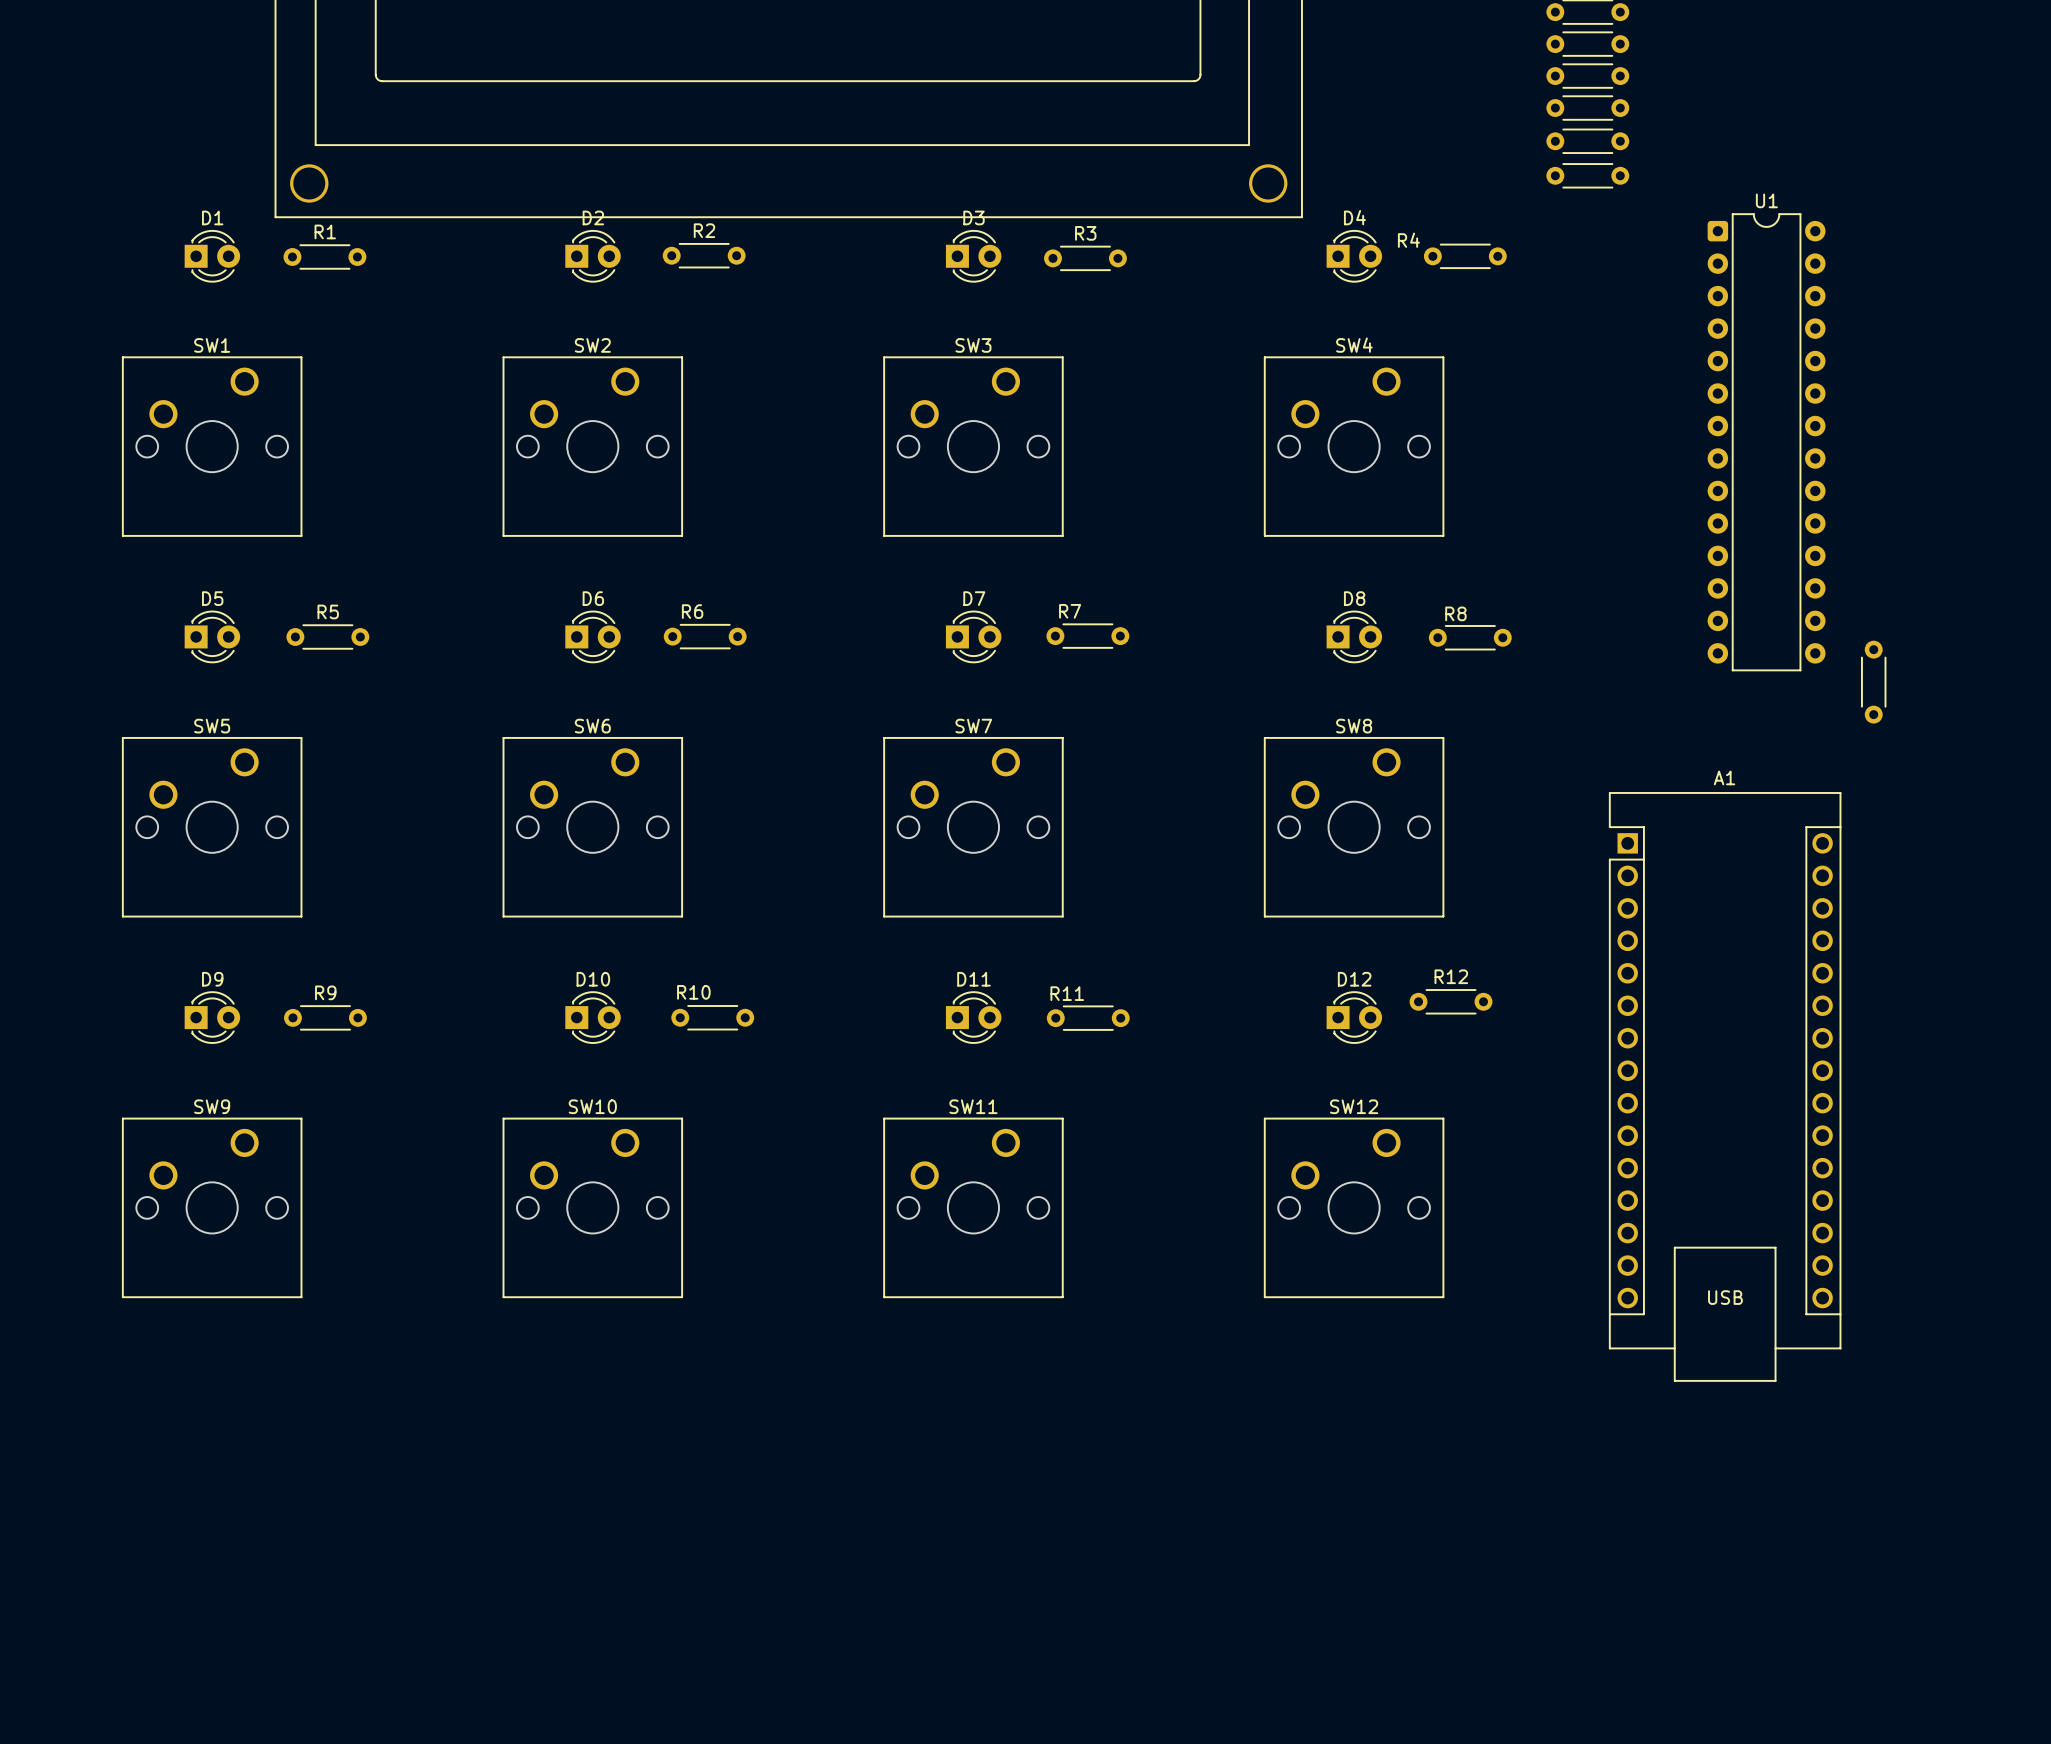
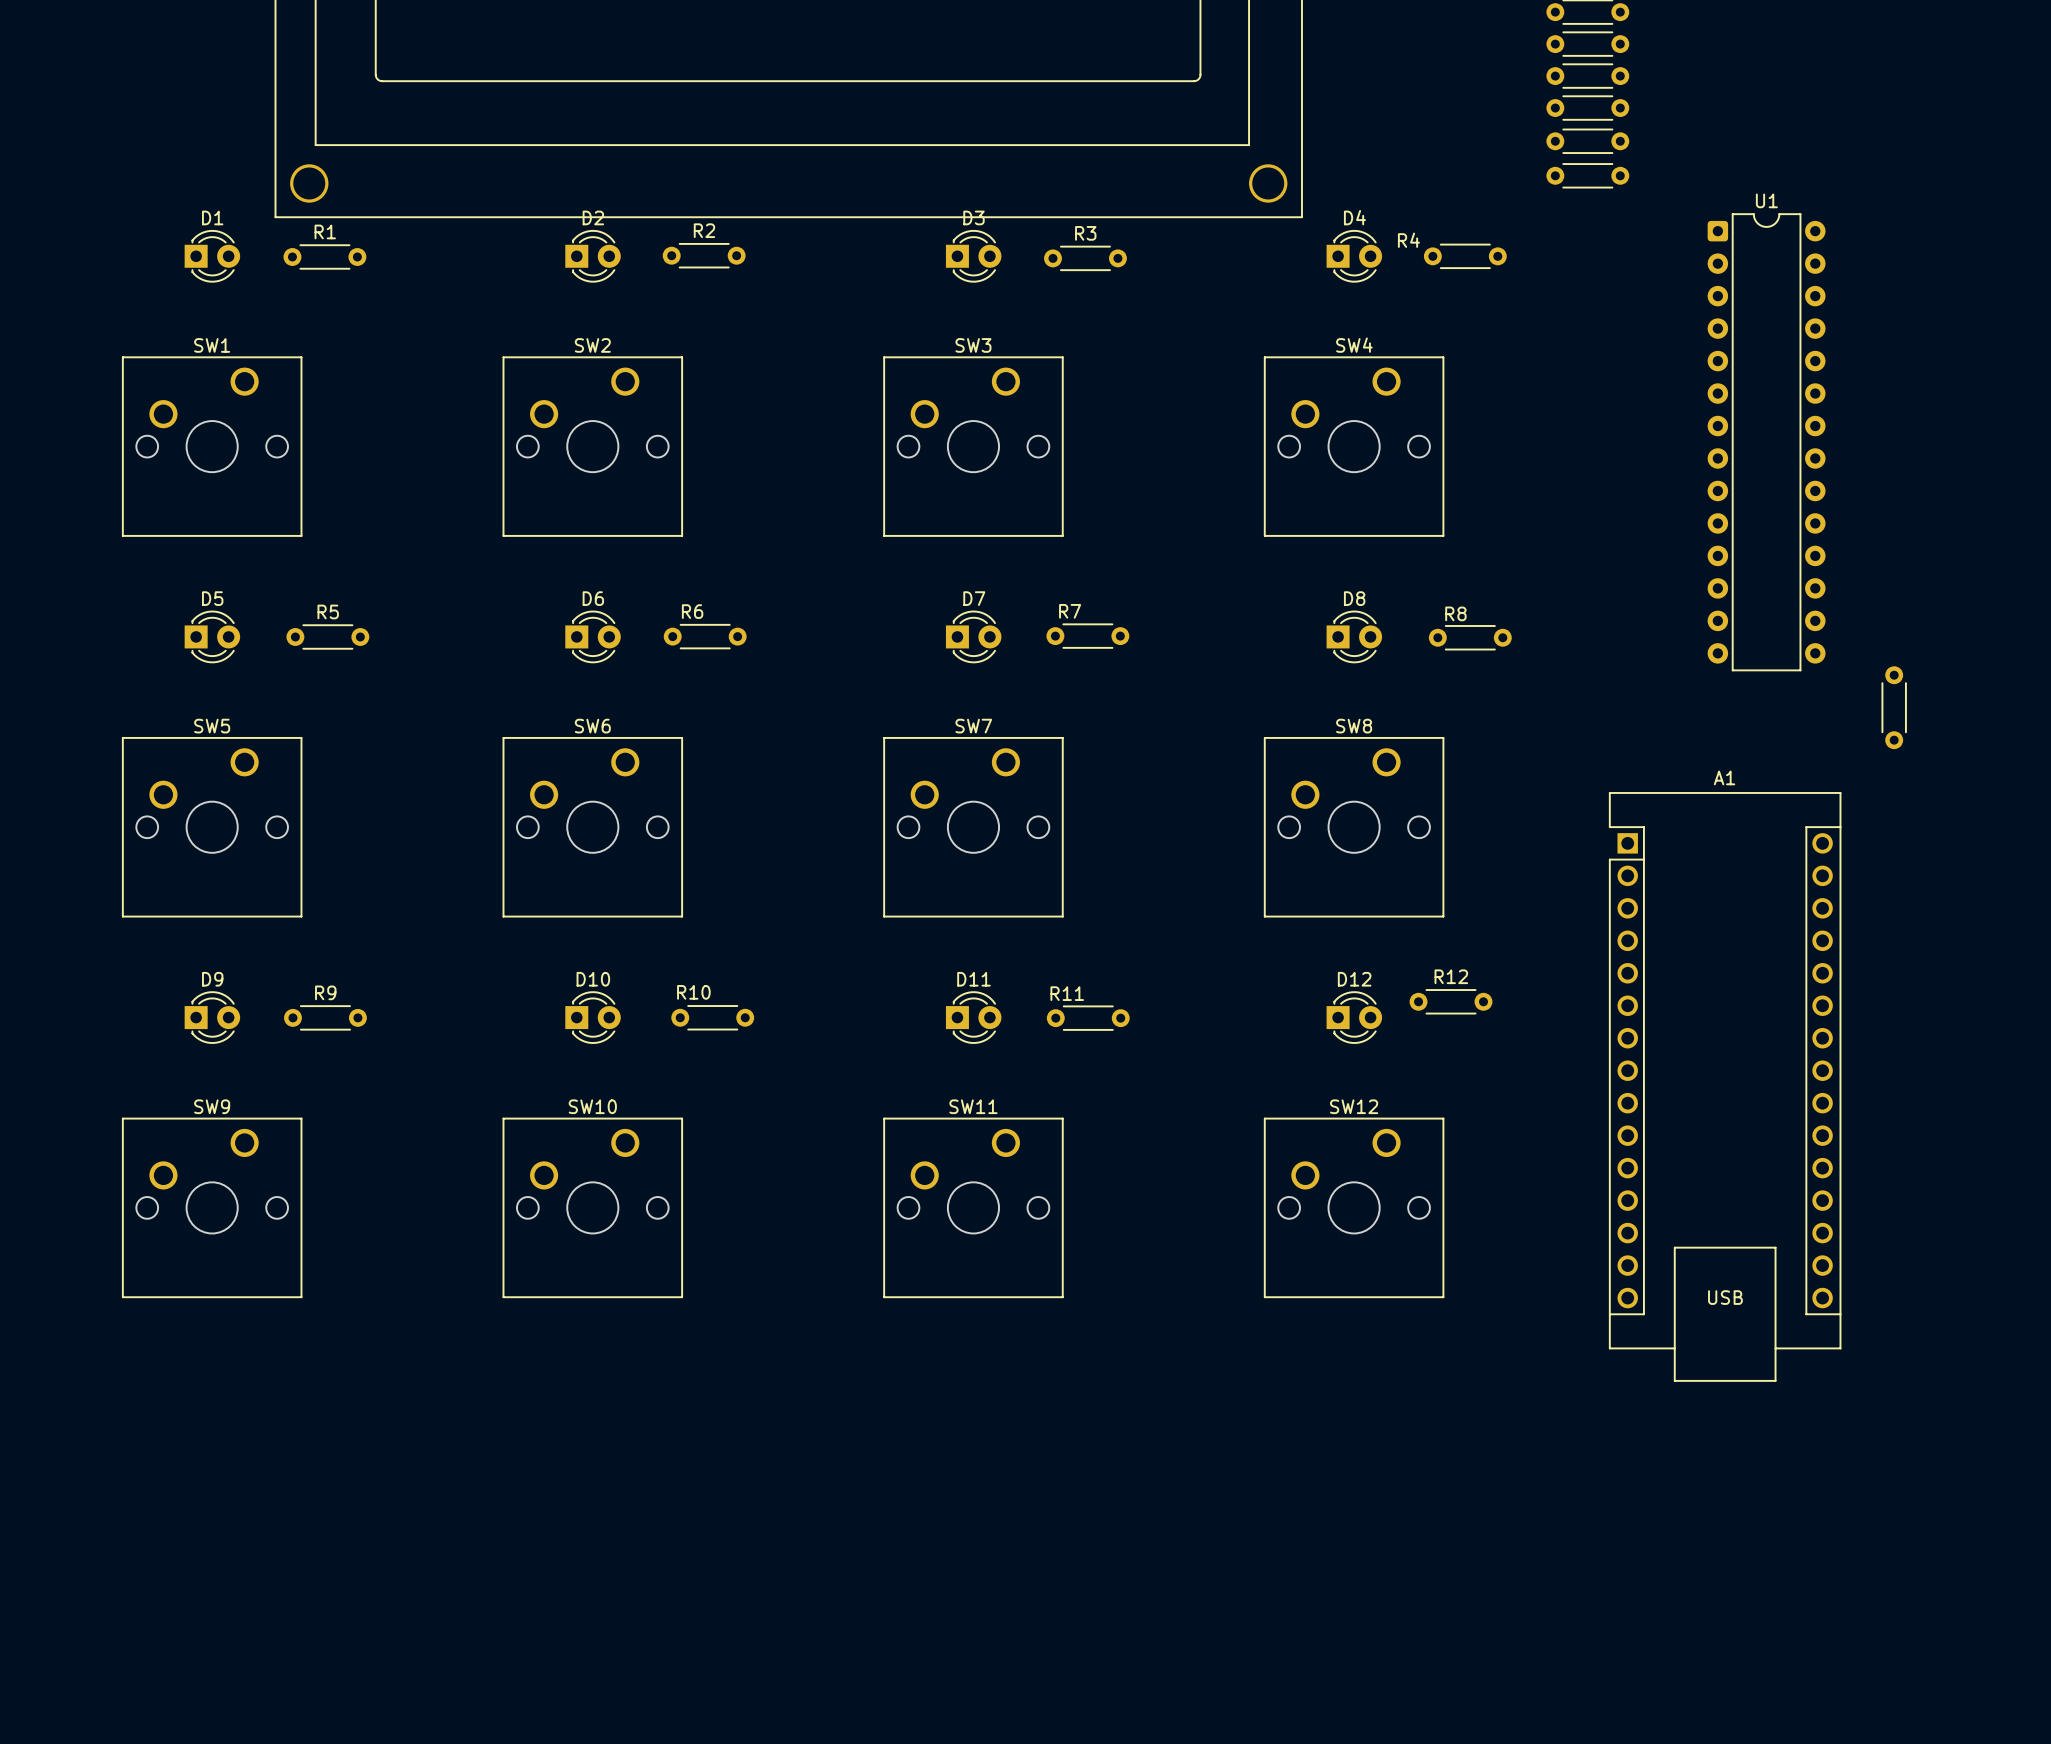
part position: (1873, 682) -> (1894, 707)

